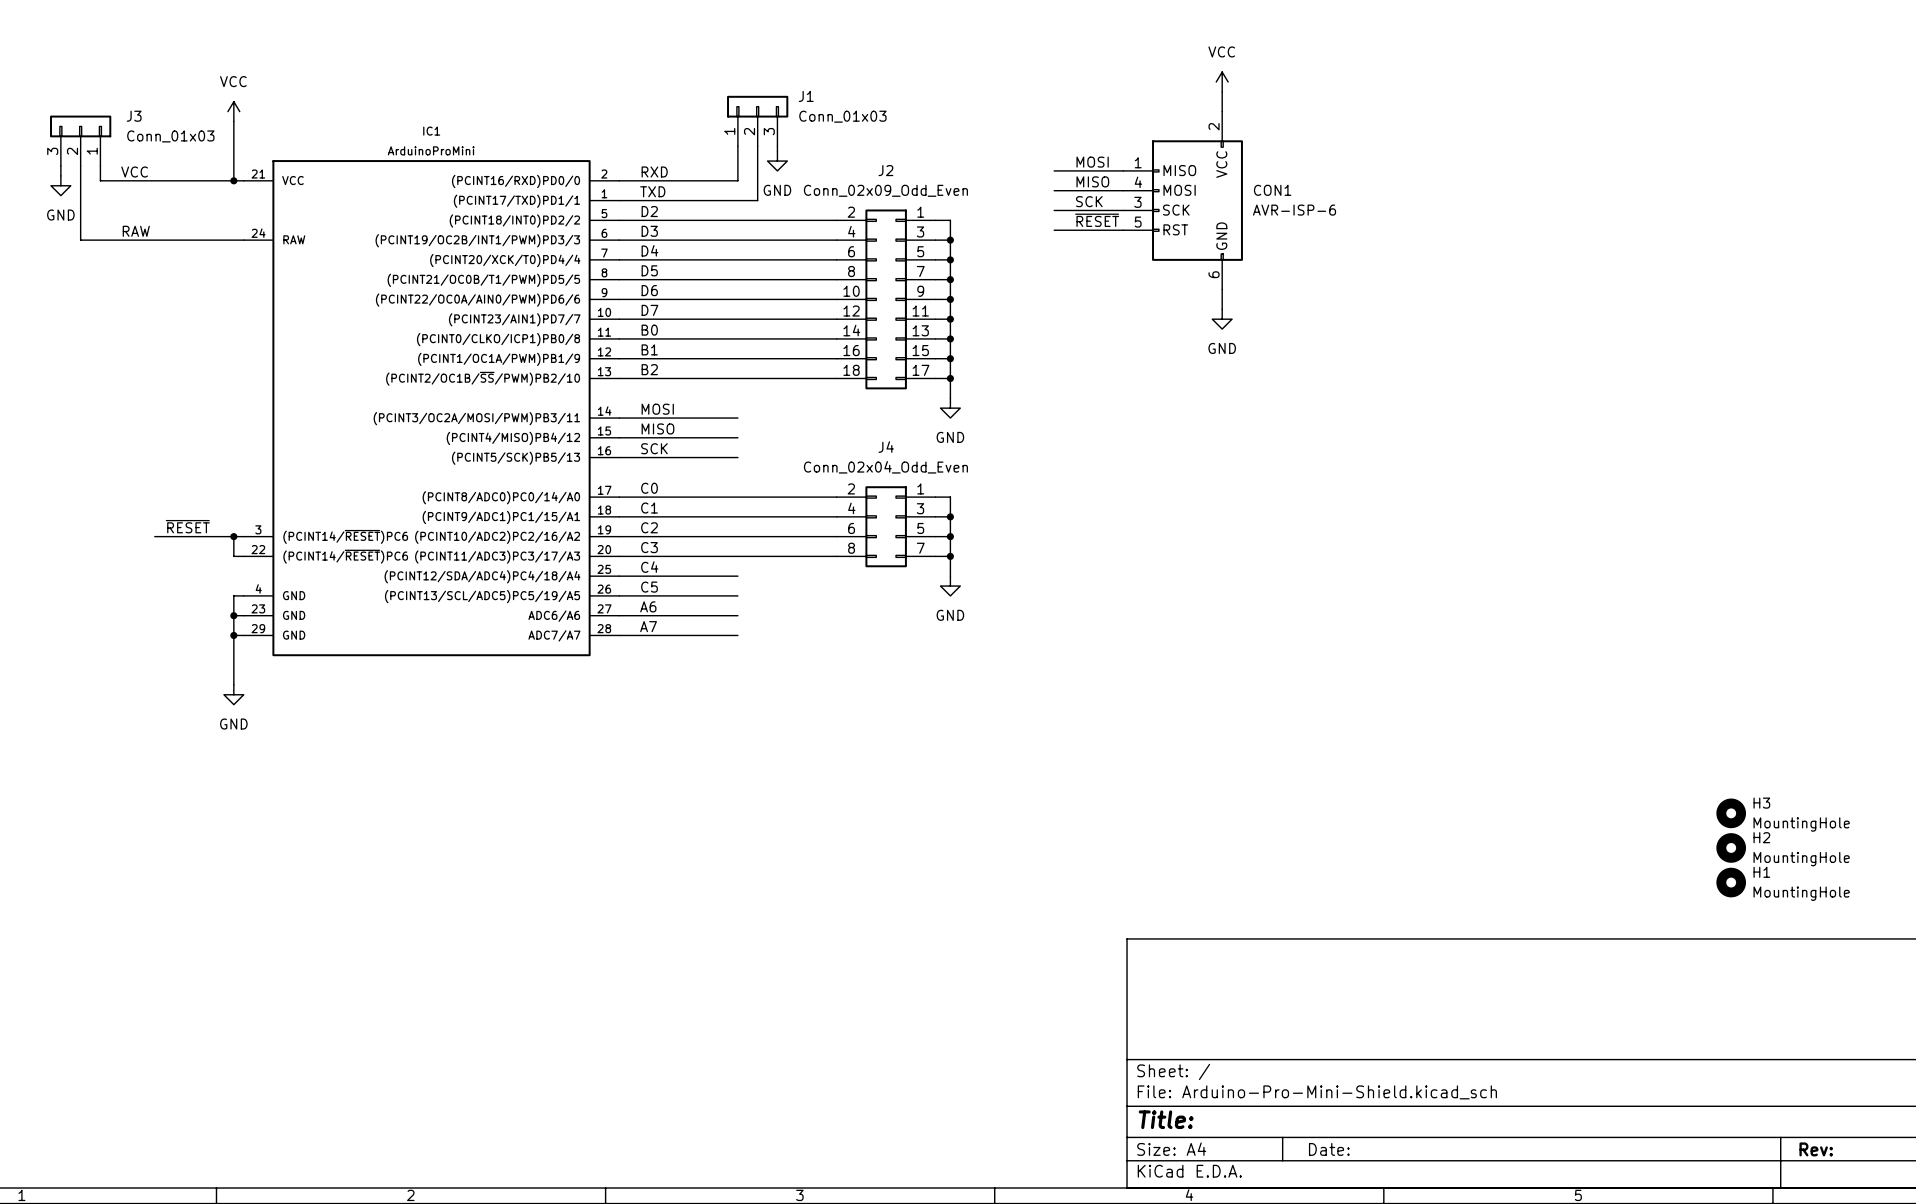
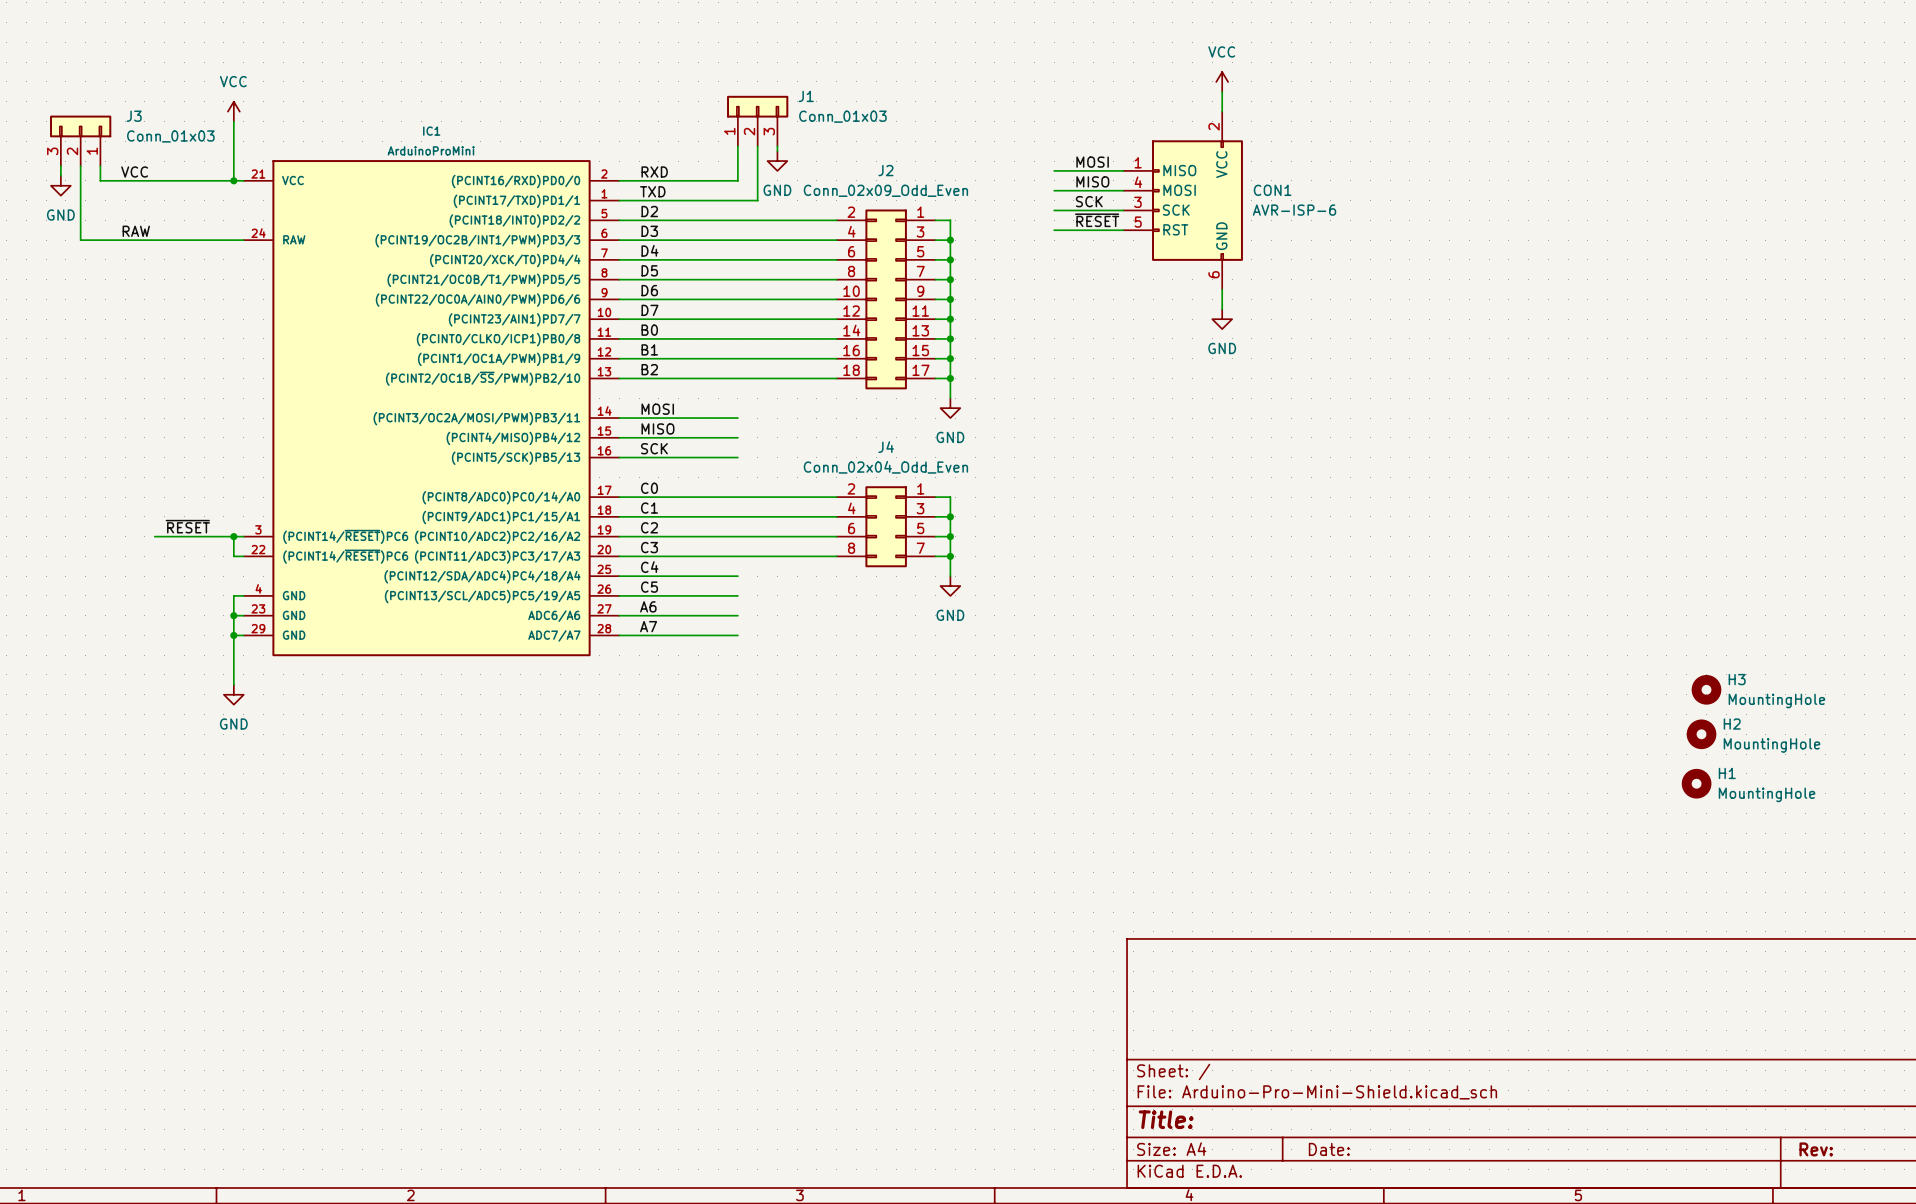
H3 position: (1731, 813) -> (1706, 689)
H2 position: (1731, 847) -> (1701, 734)
H1 position: (1731, 882) -> (1696, 783)

